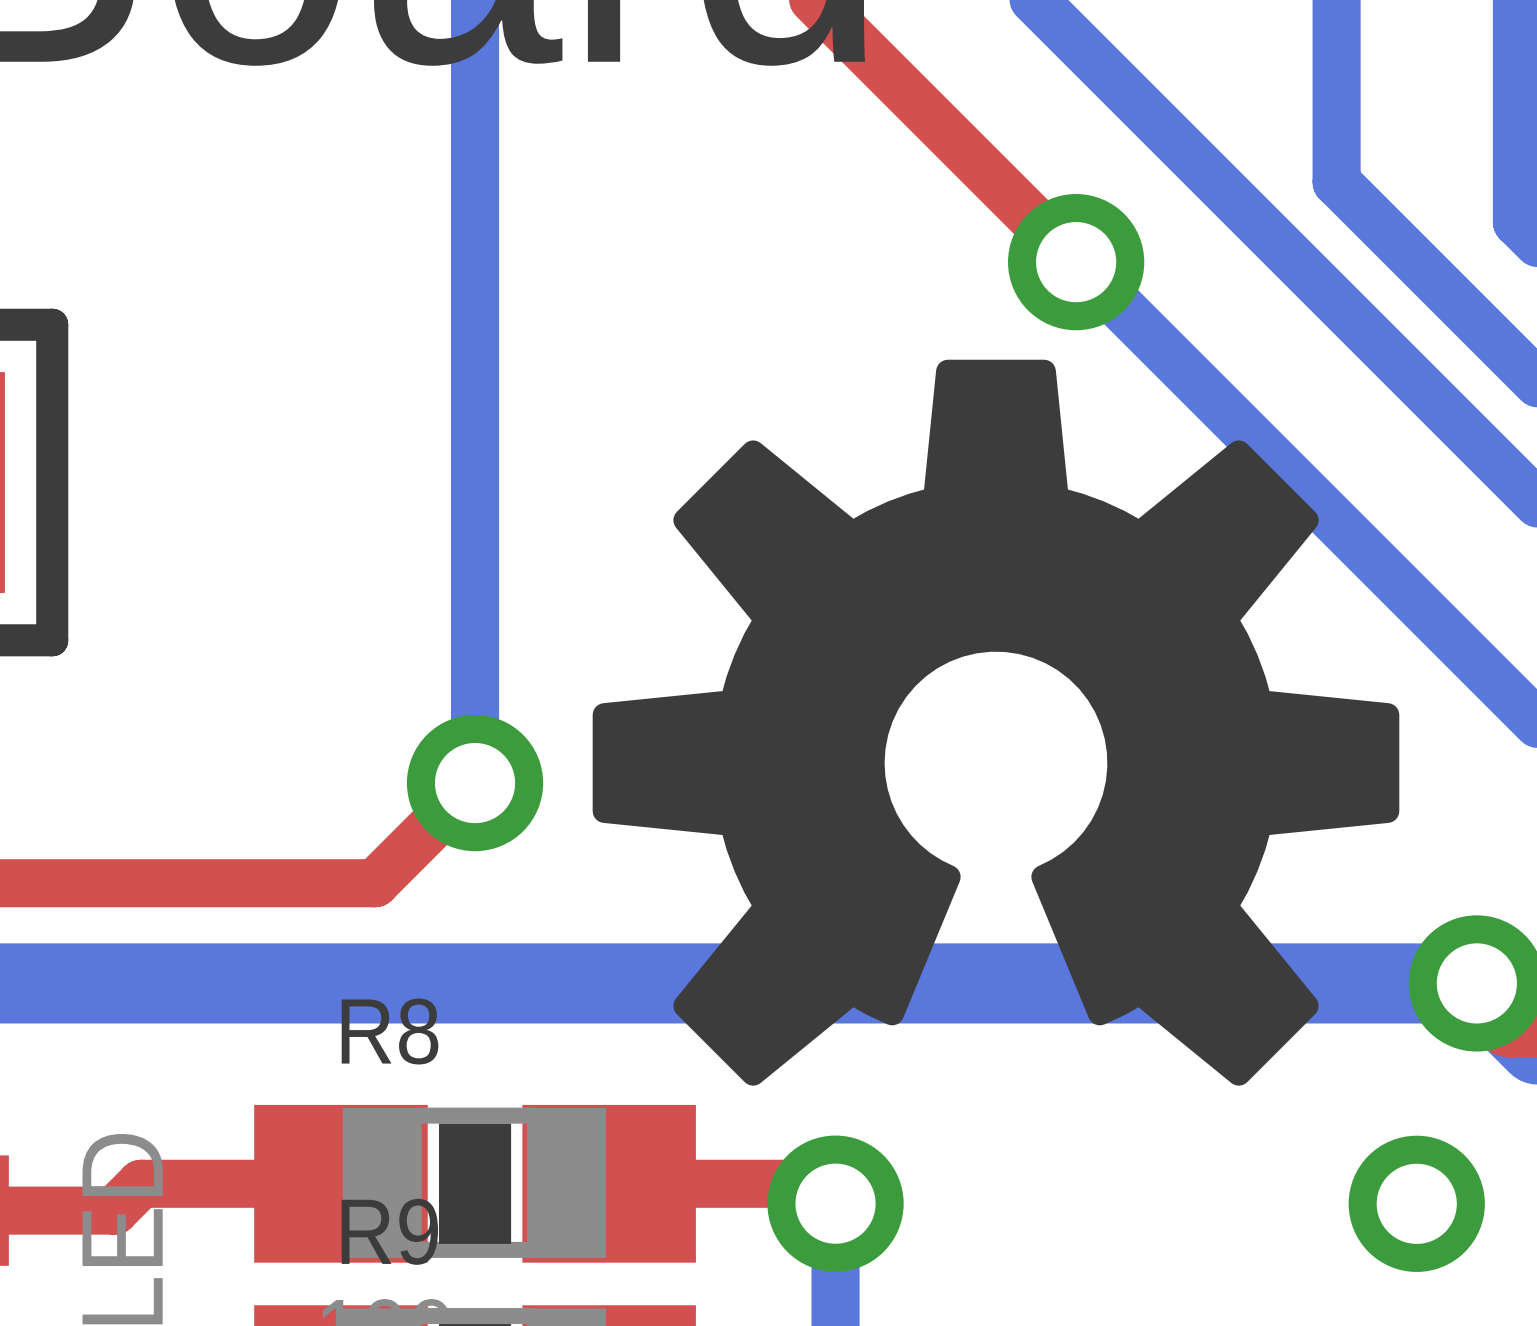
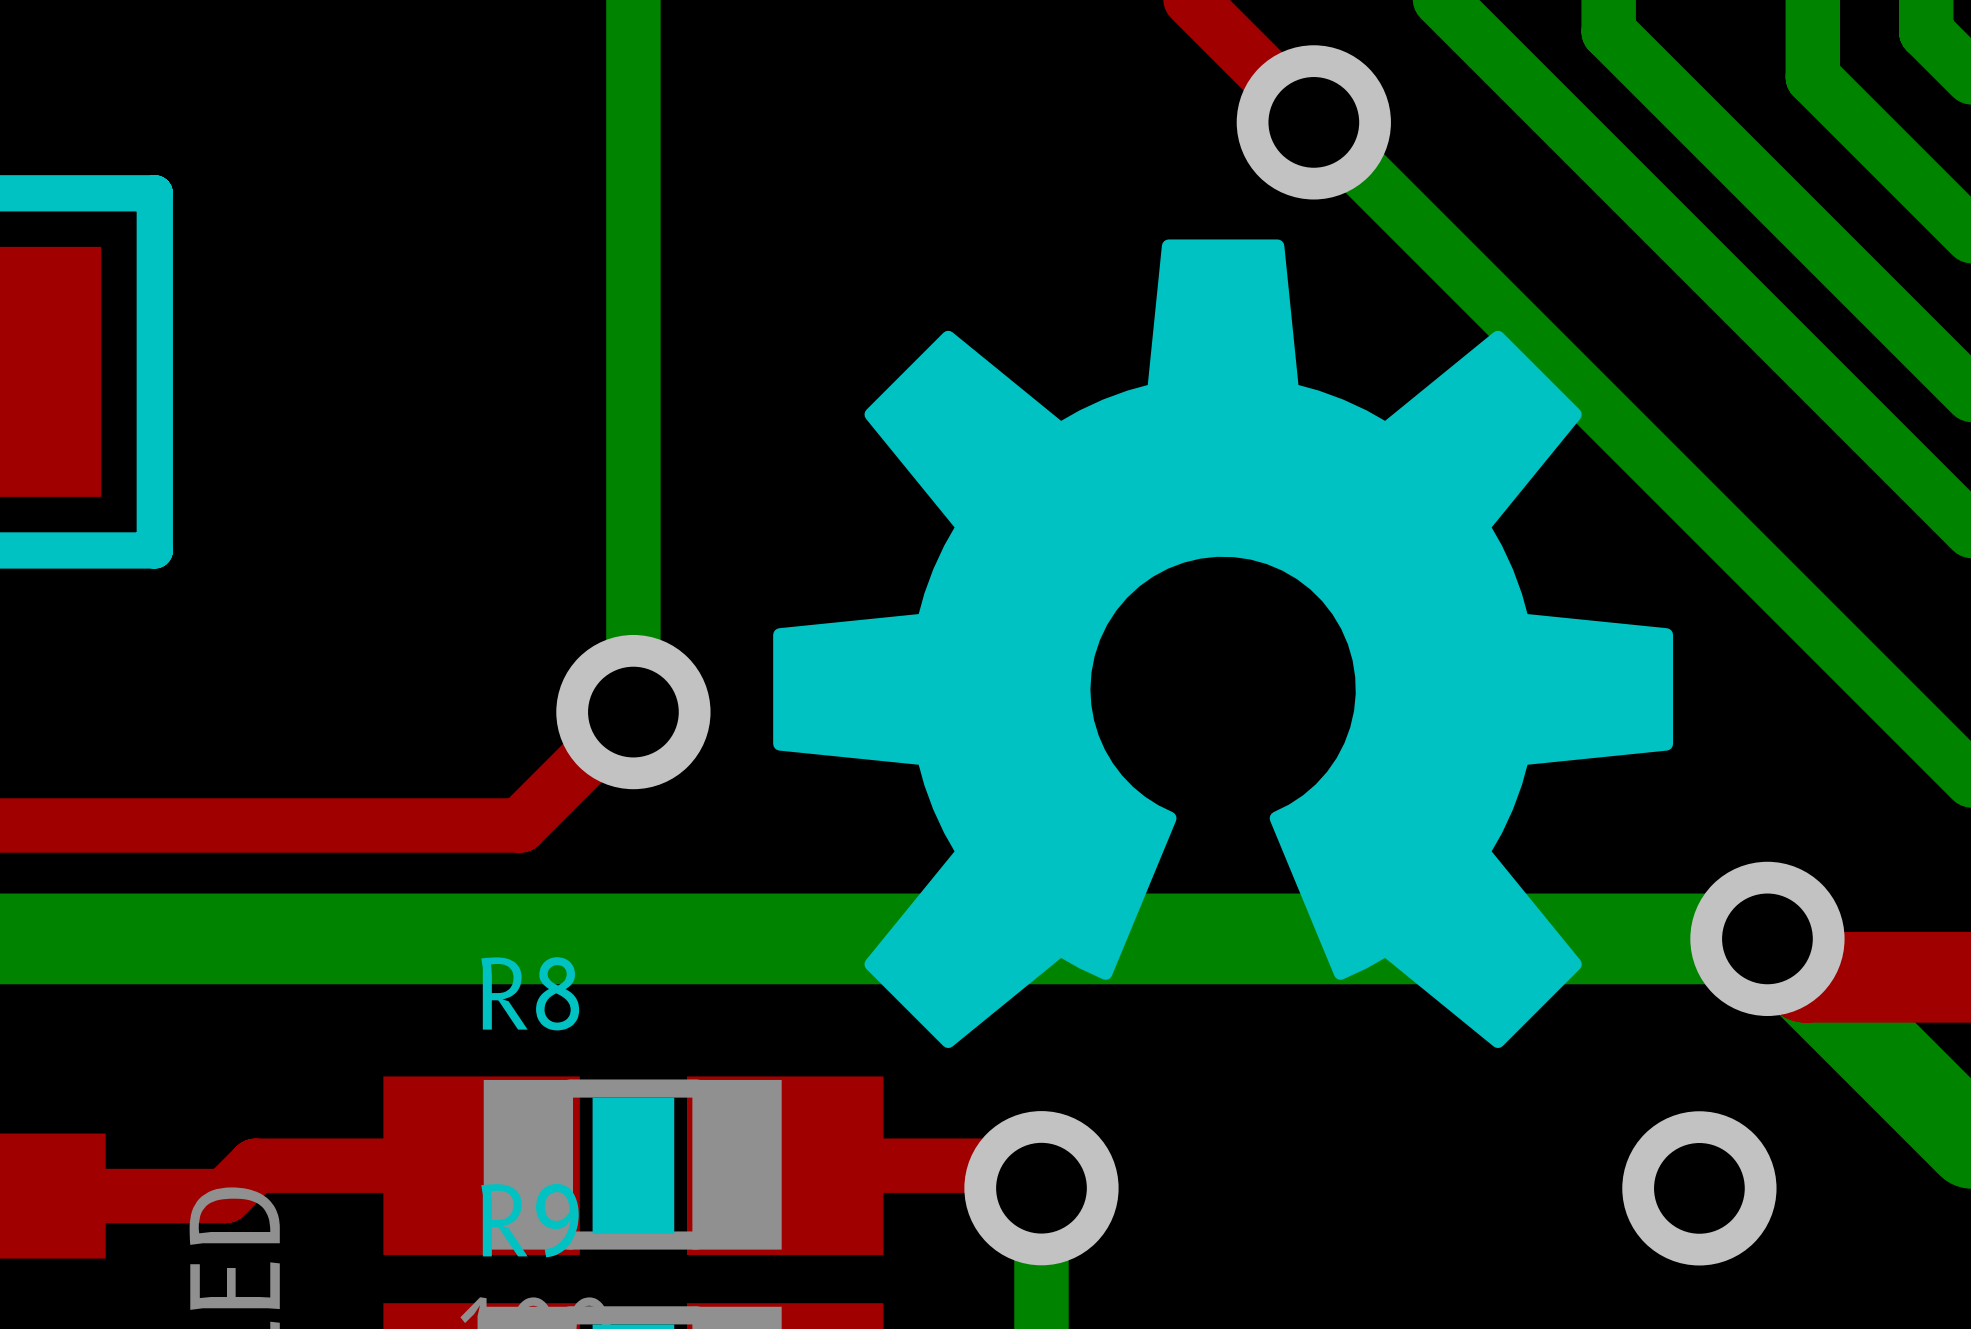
drawing shape: [592, 359, 1400, 1086] -> [773, 239, 1674, 1049]

